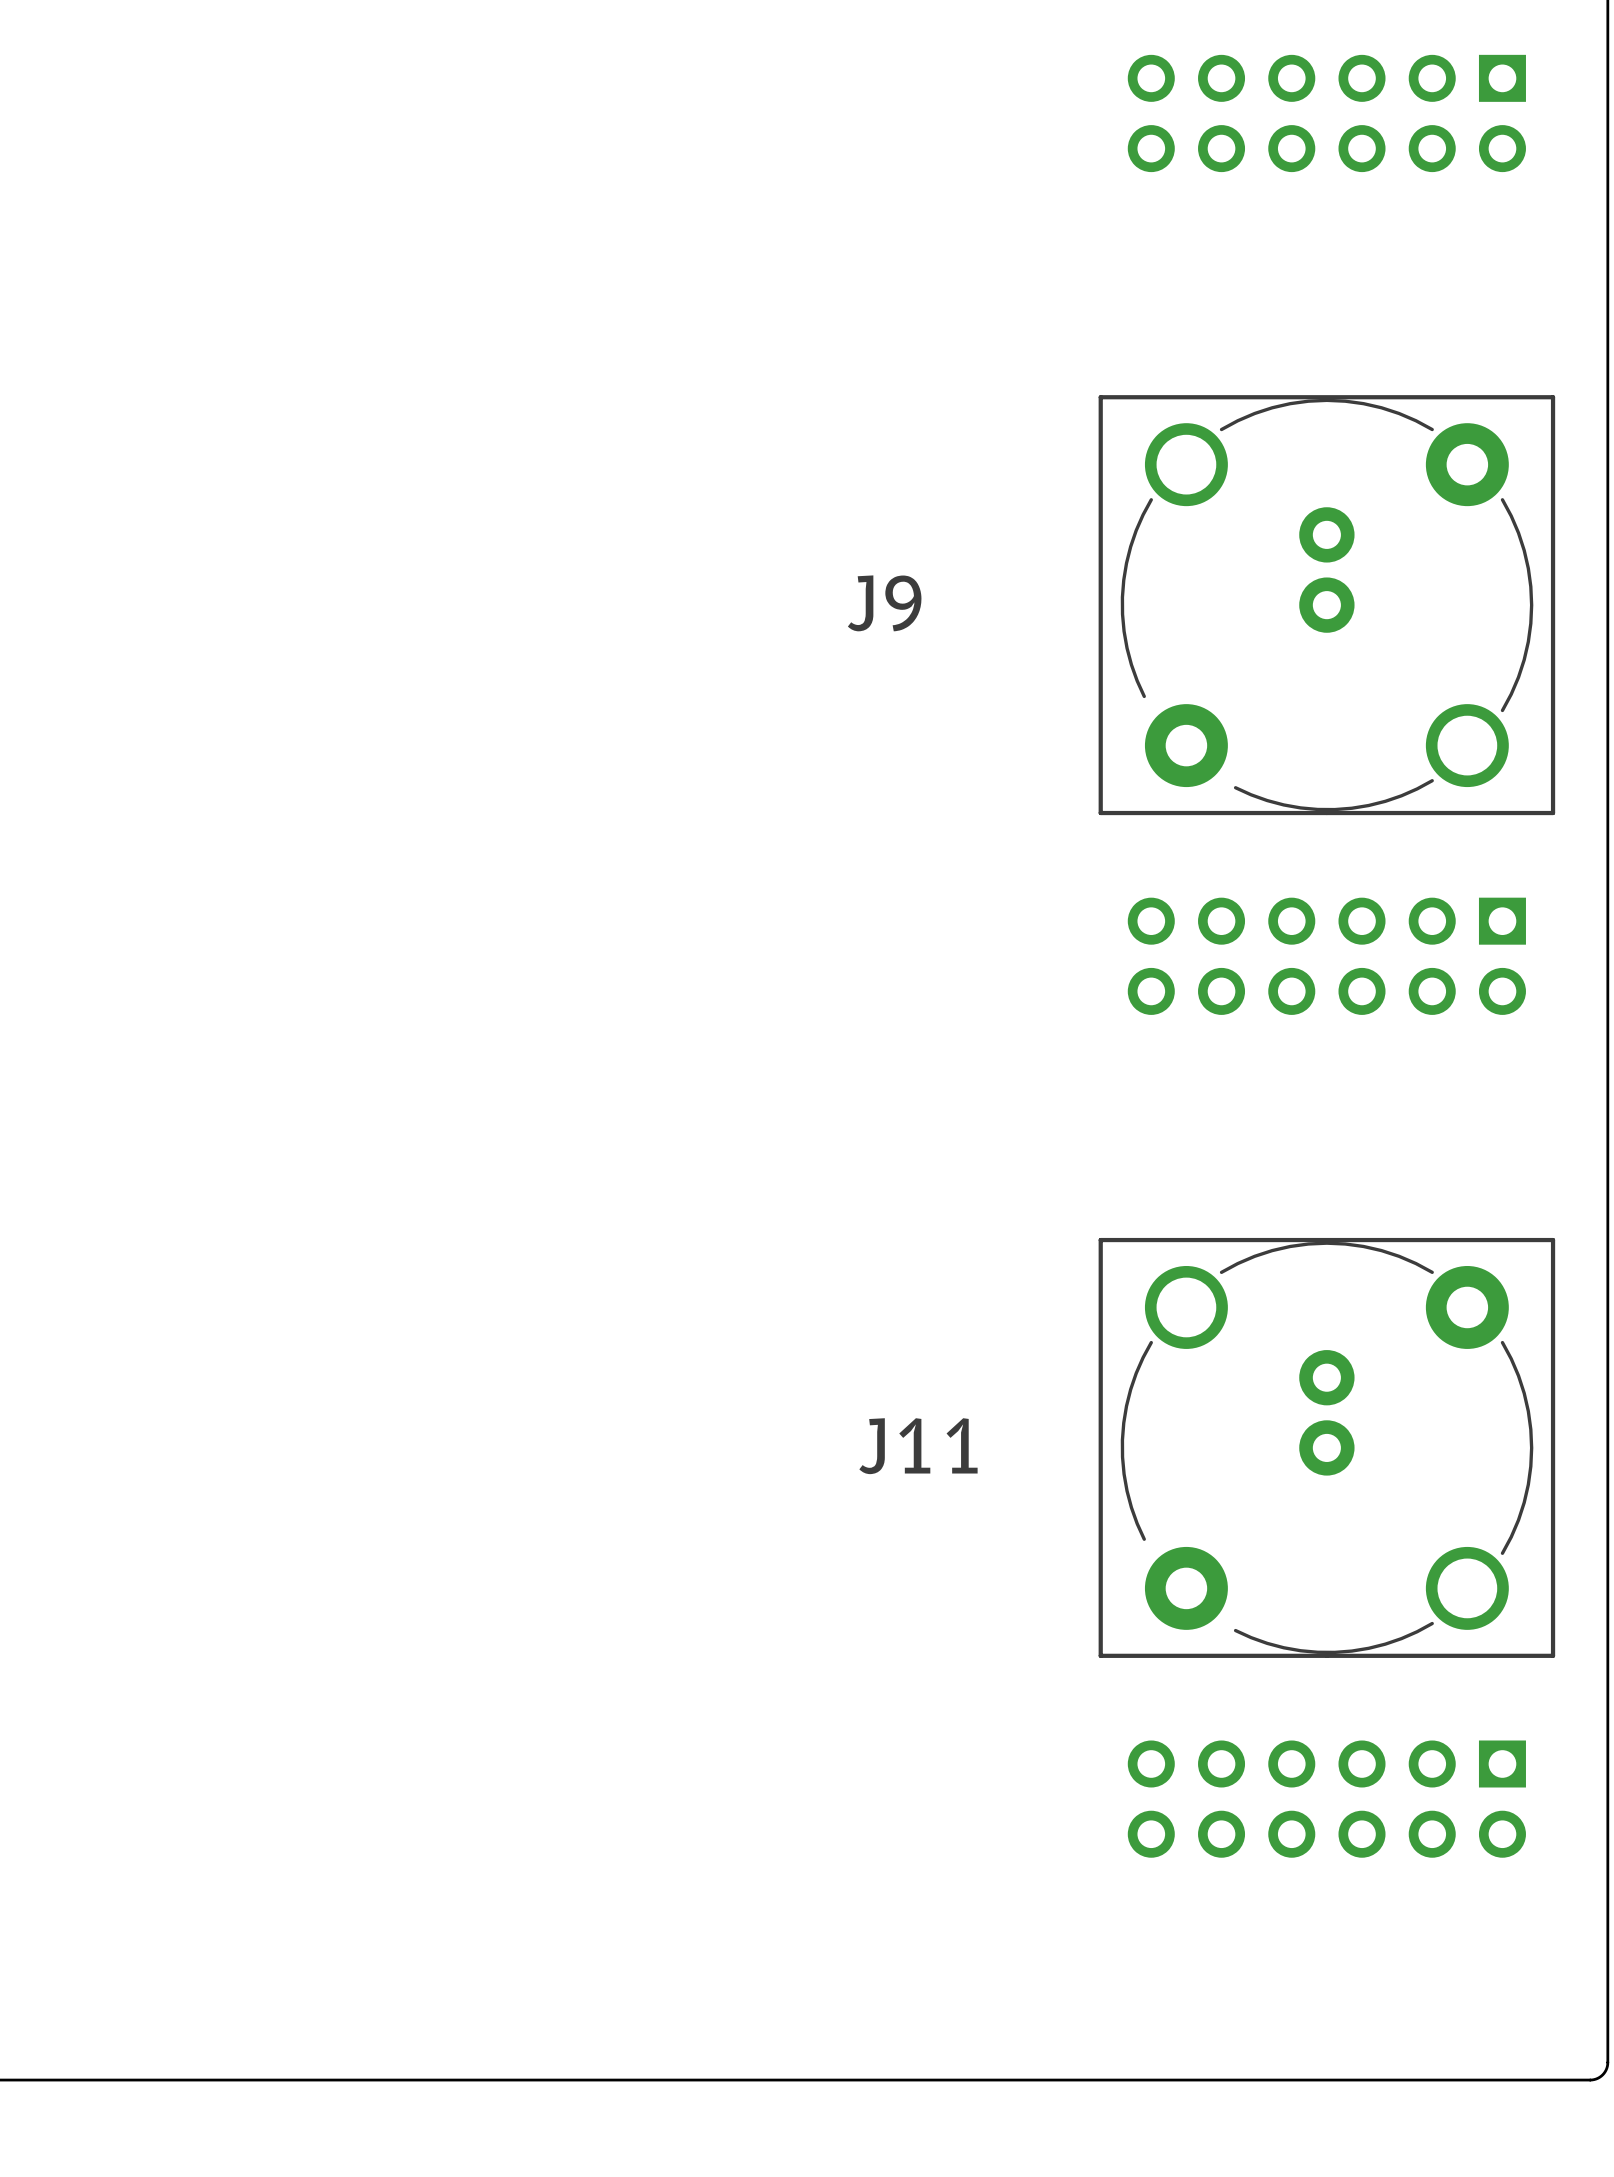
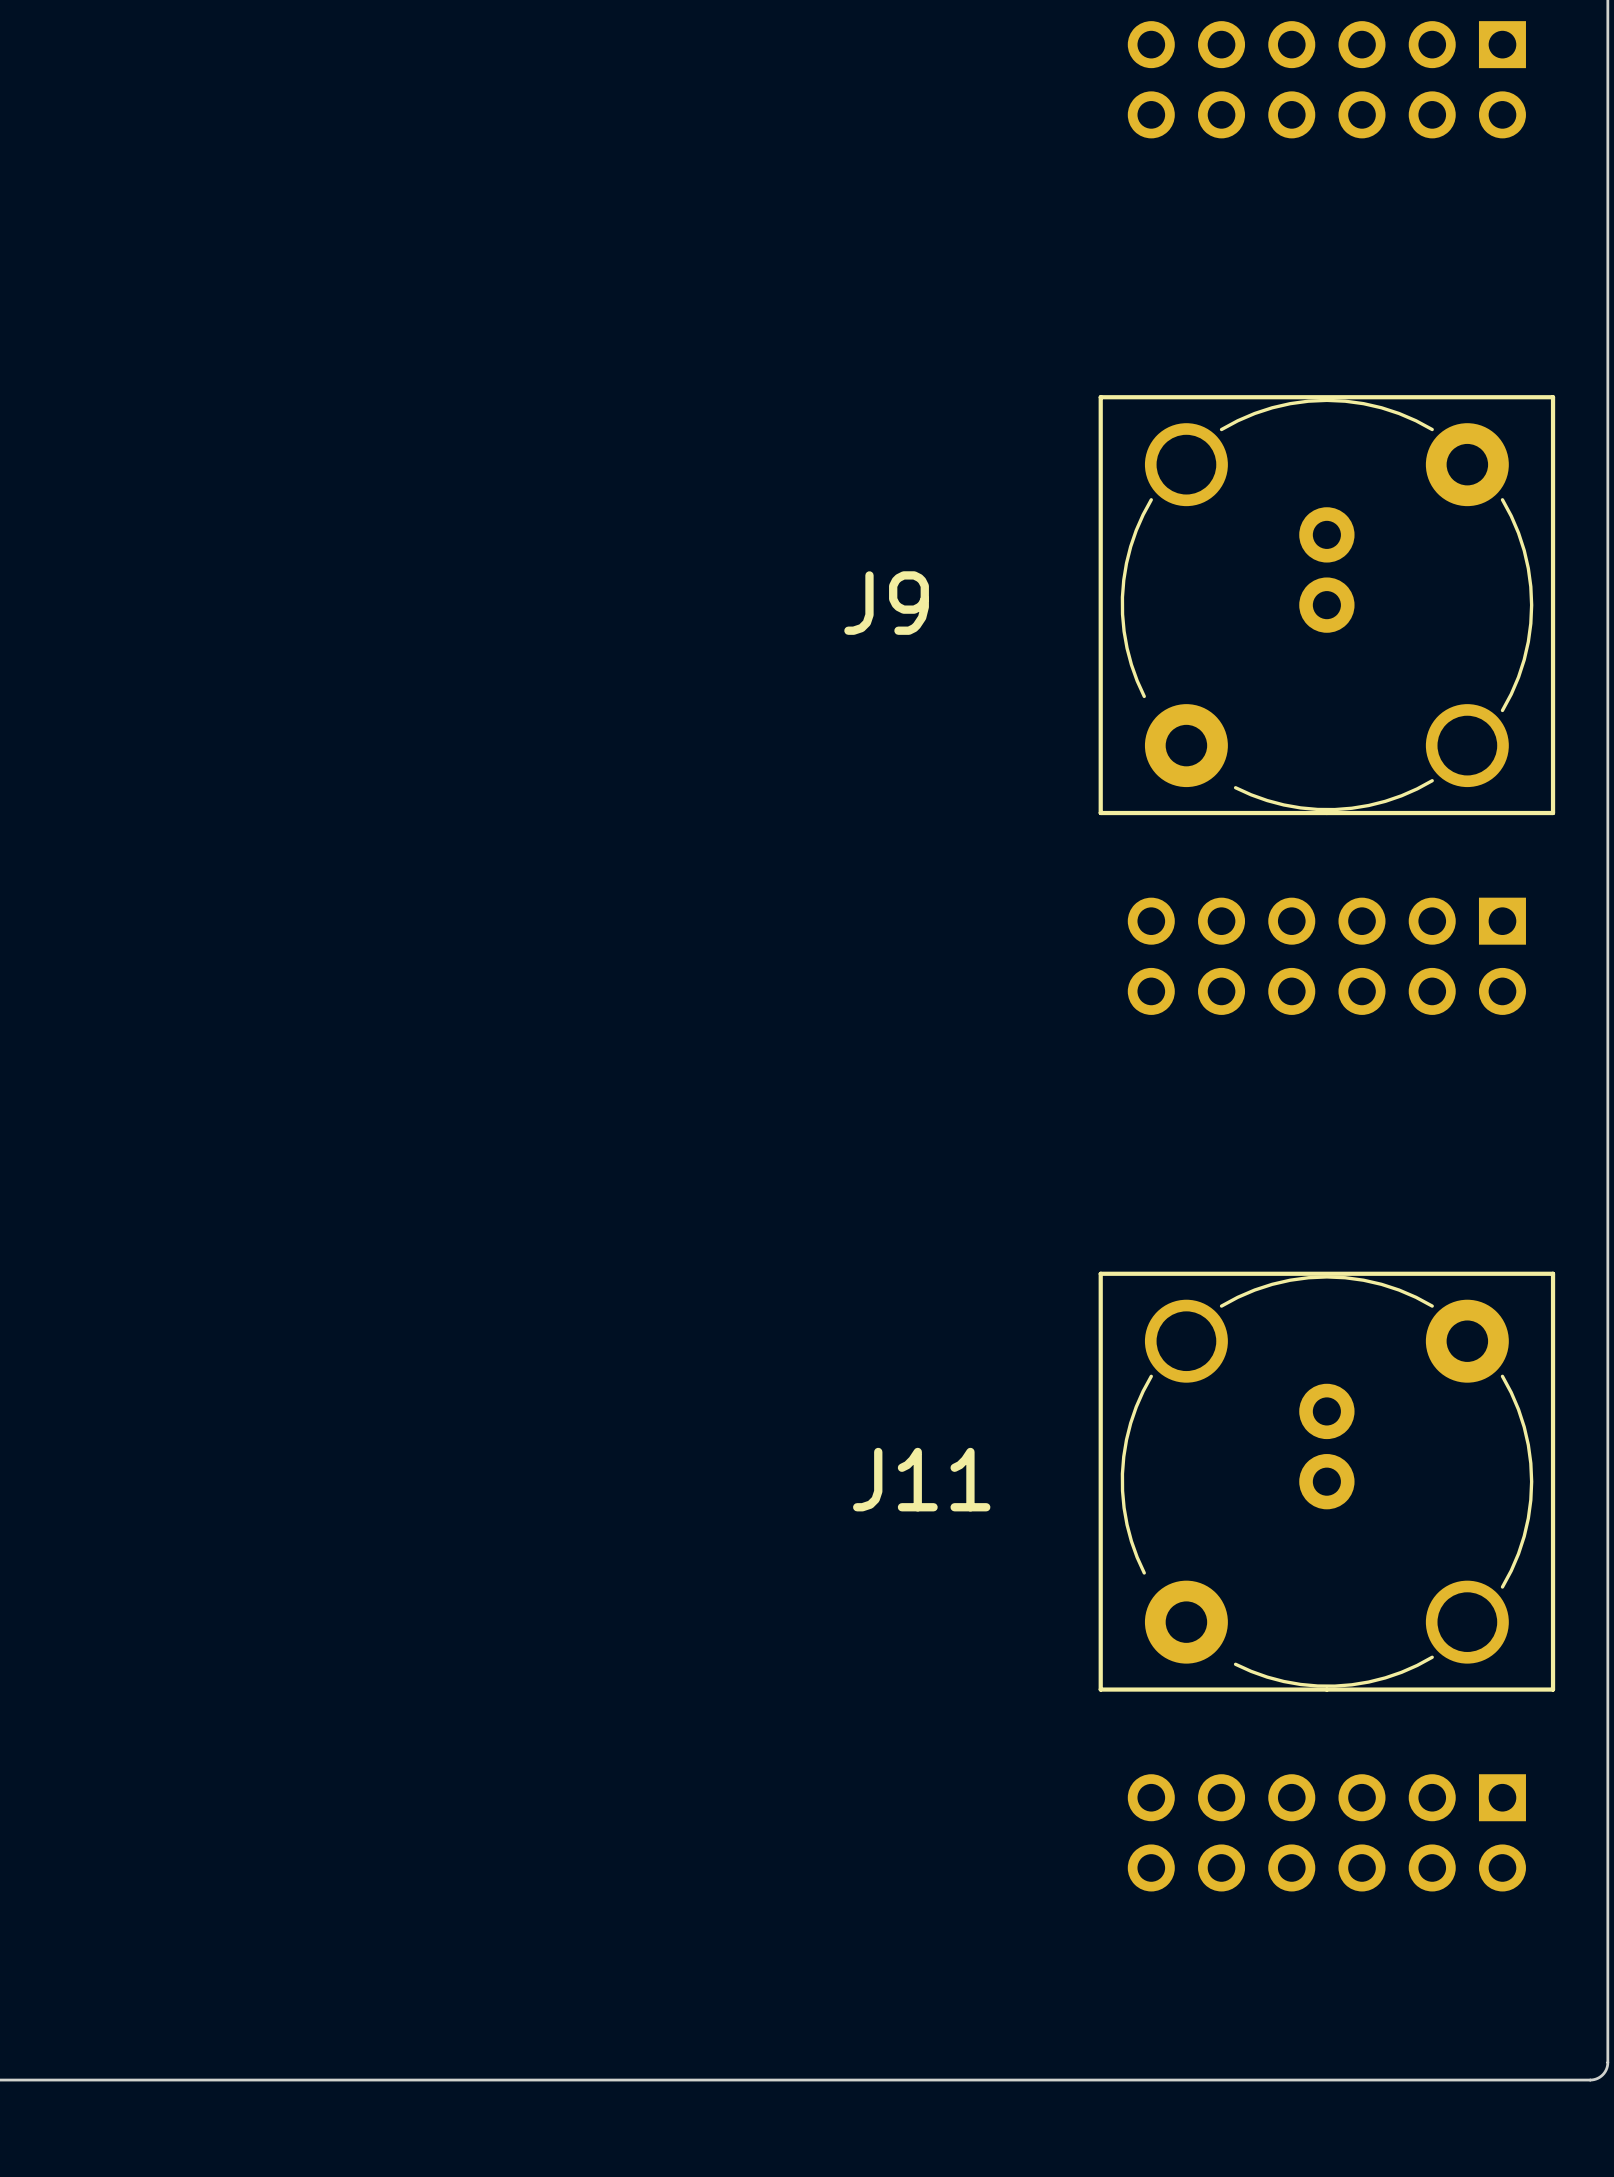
part position: (1326, 113) -> (1326, 79)
J11 position: (1326, 1447) -> (1326, 1481)
part position: (1326, 1799) -> (1326, 1832)

